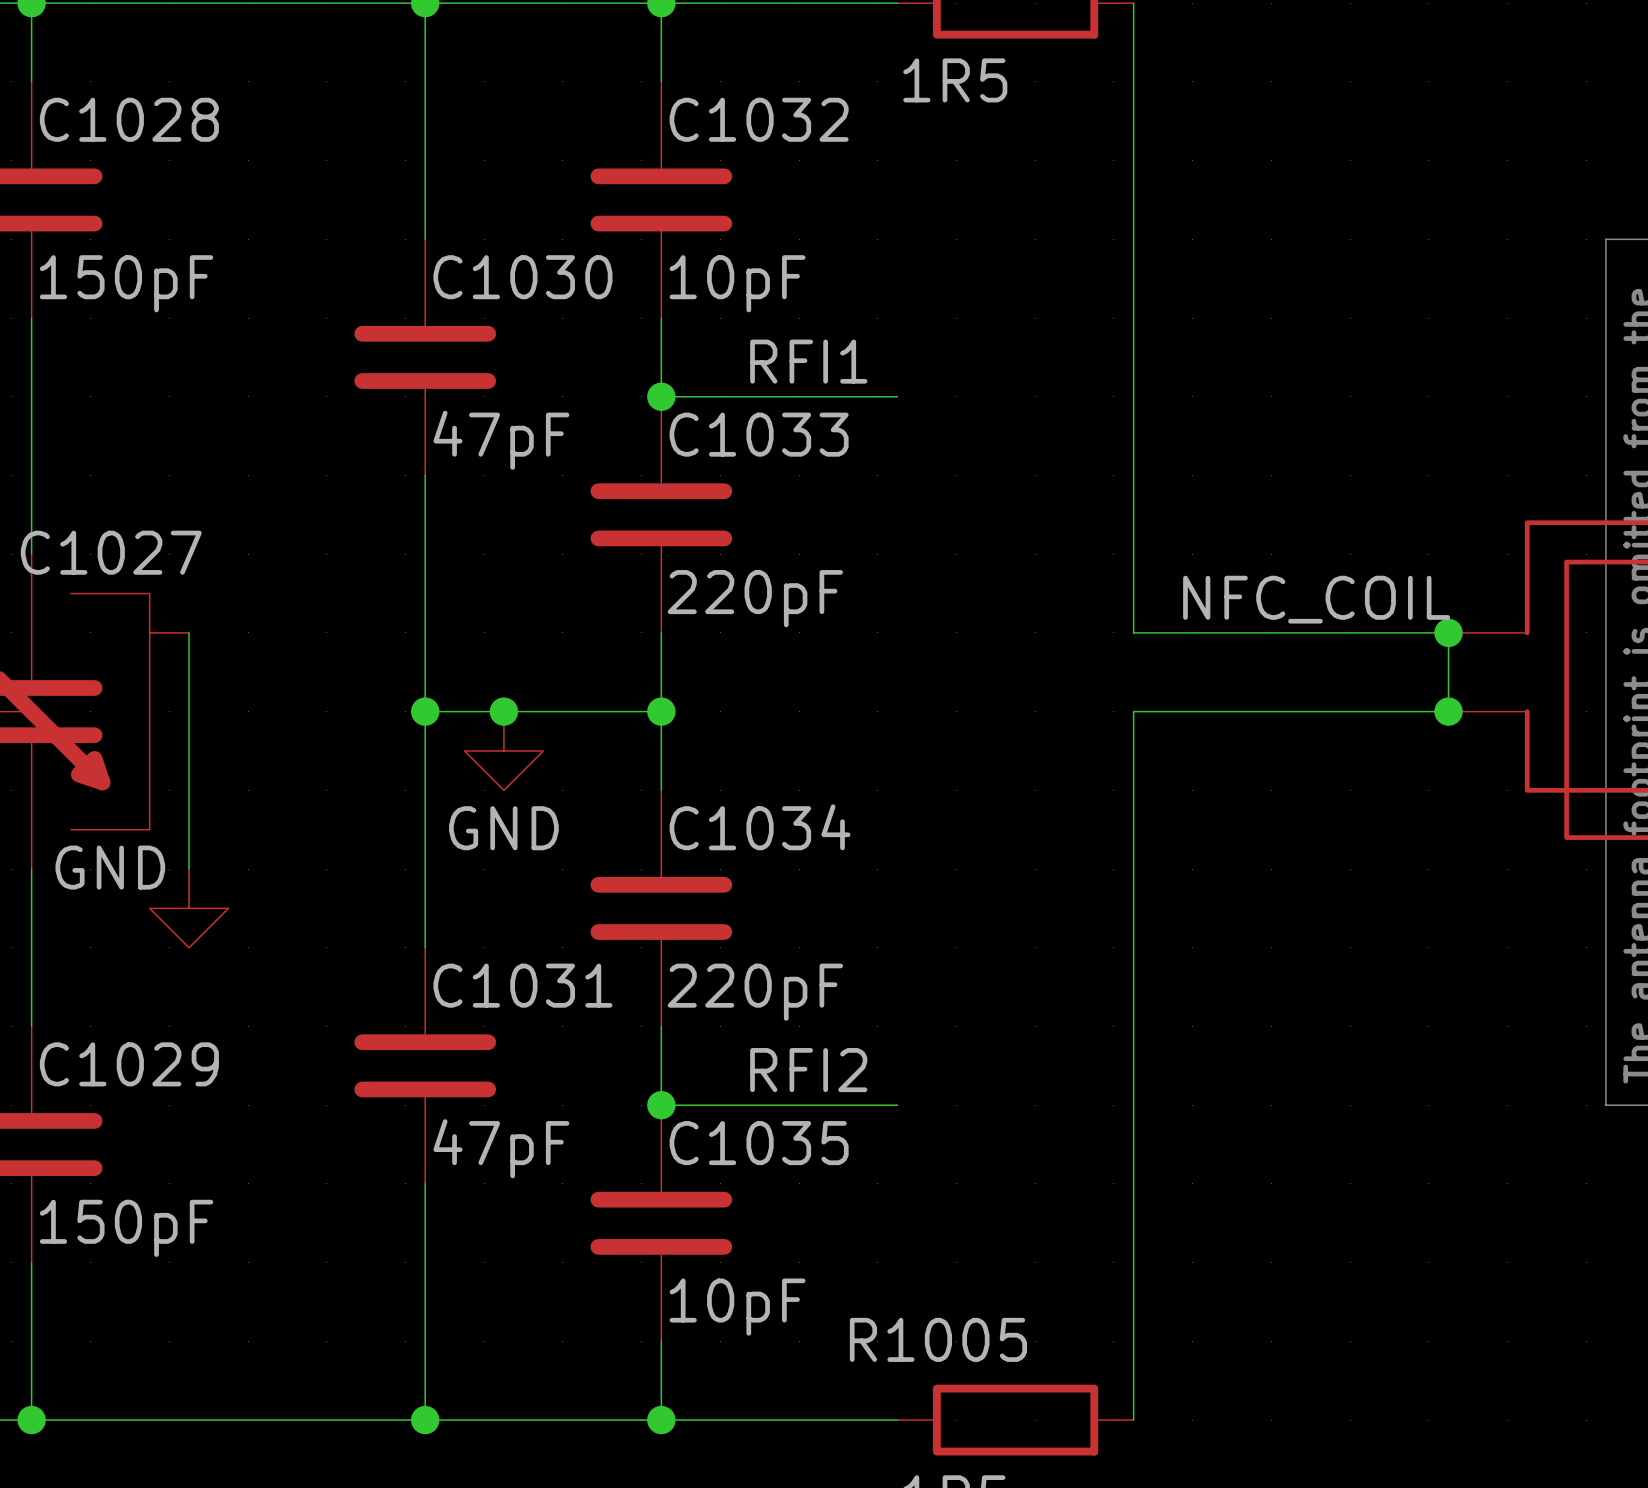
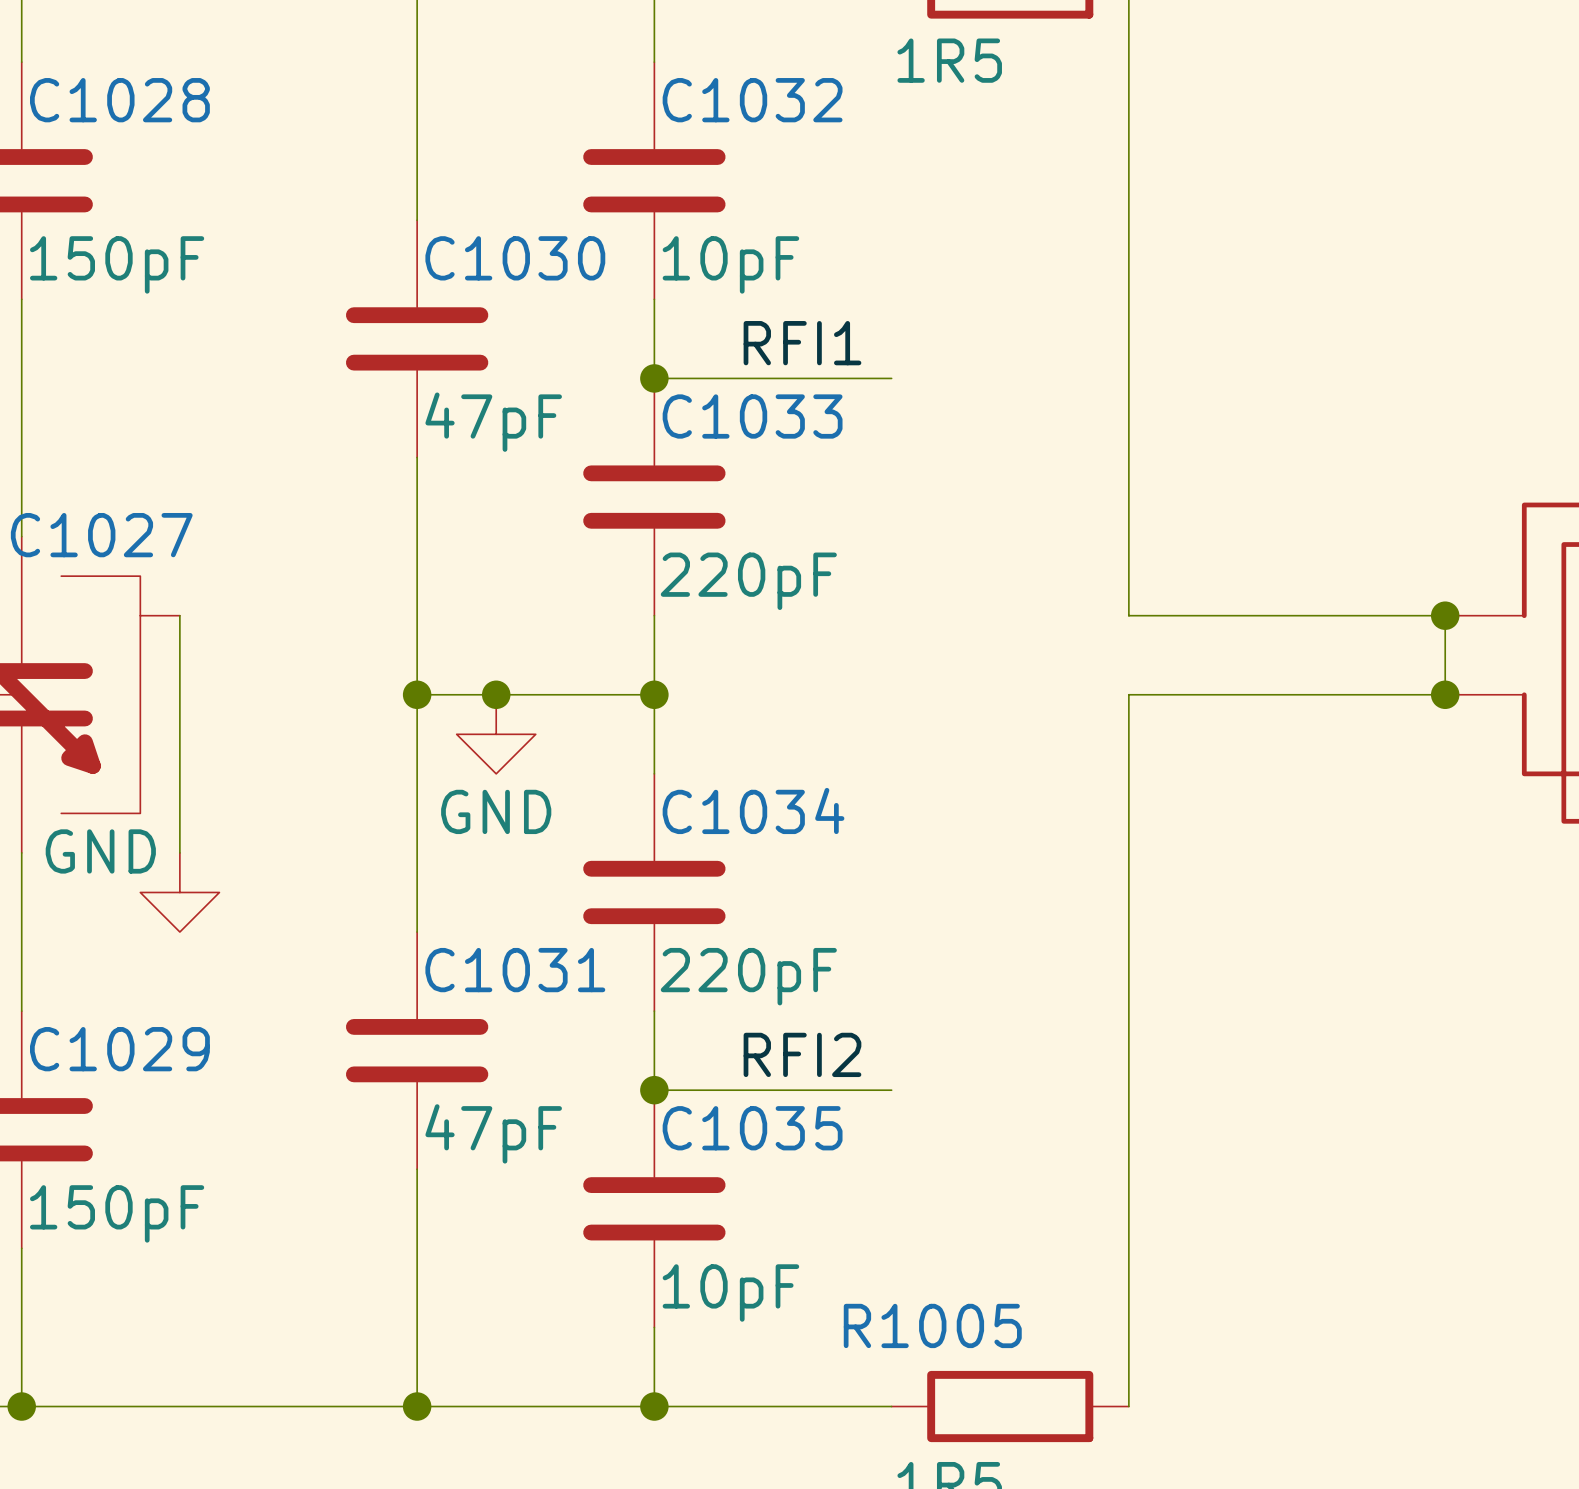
label: NFC_COIL (1316, 599) -> none

